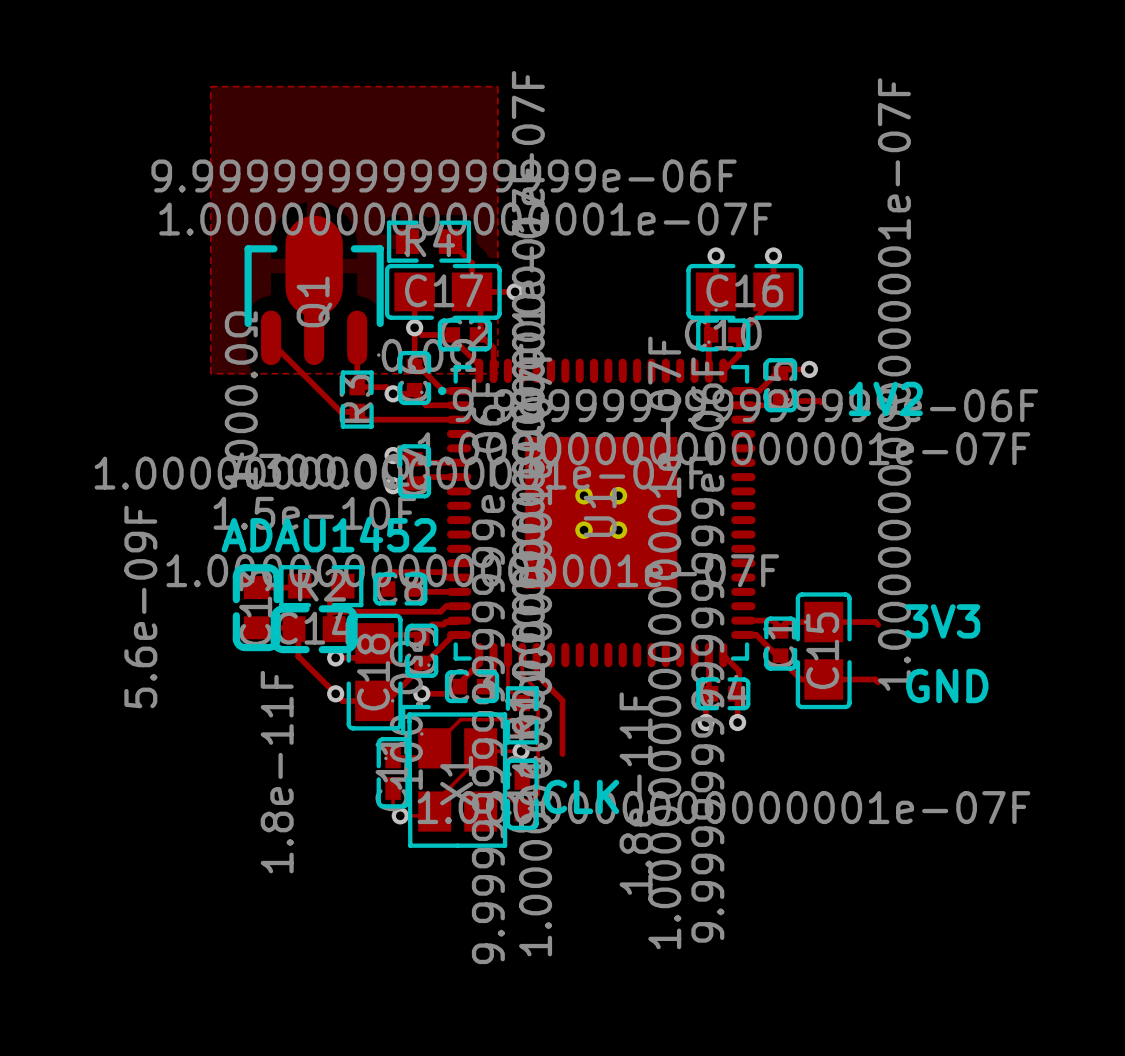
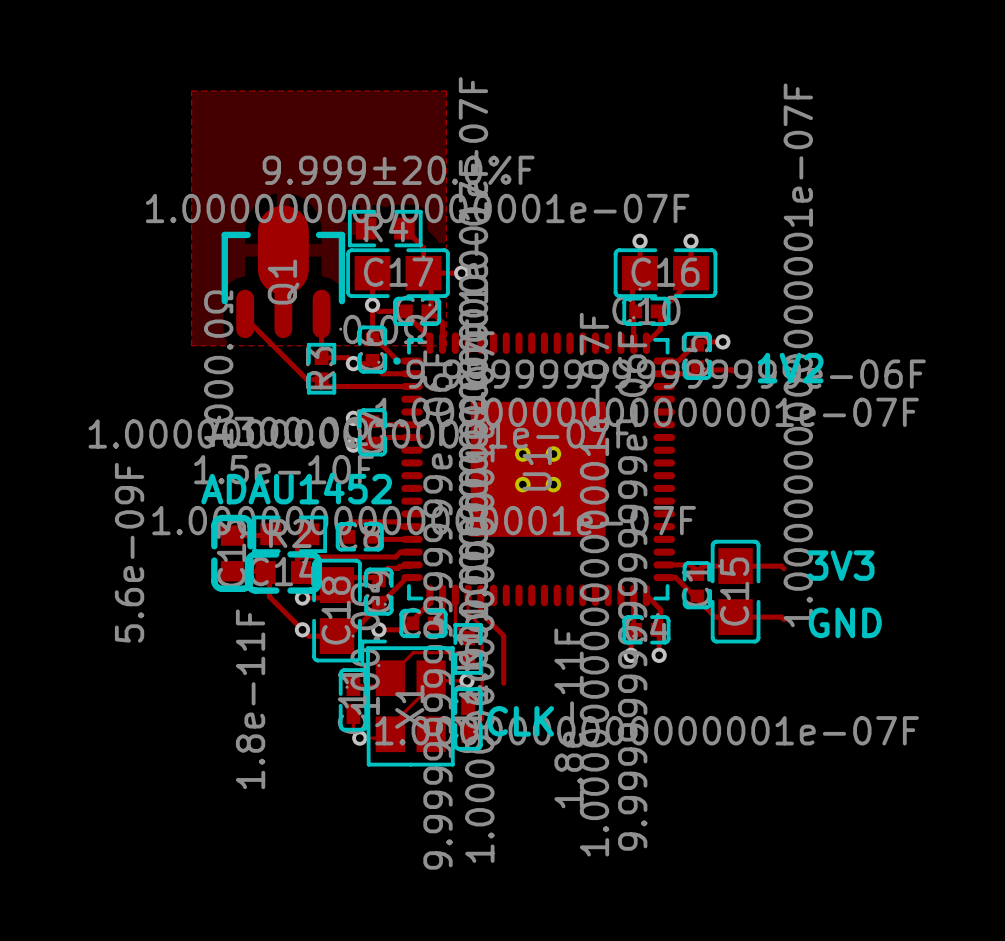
C17 value: 9.999999999999999e-06F (444, 175) -> 9.999±20.0%F (398, 170)

